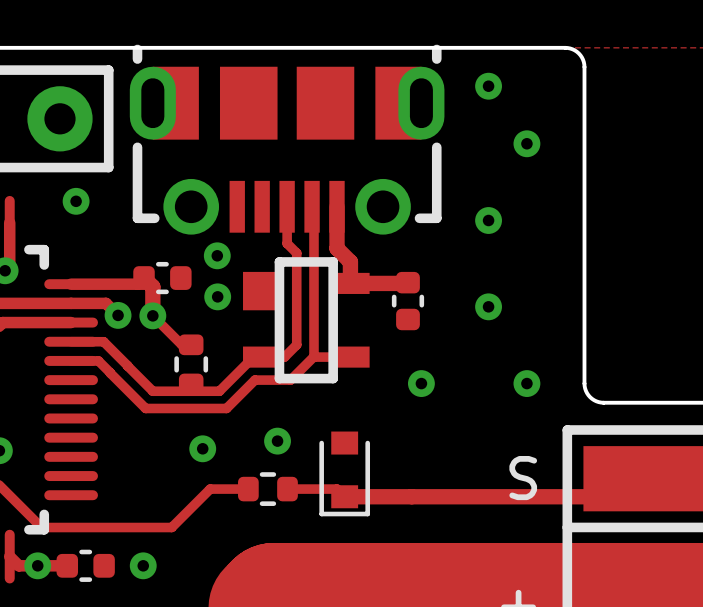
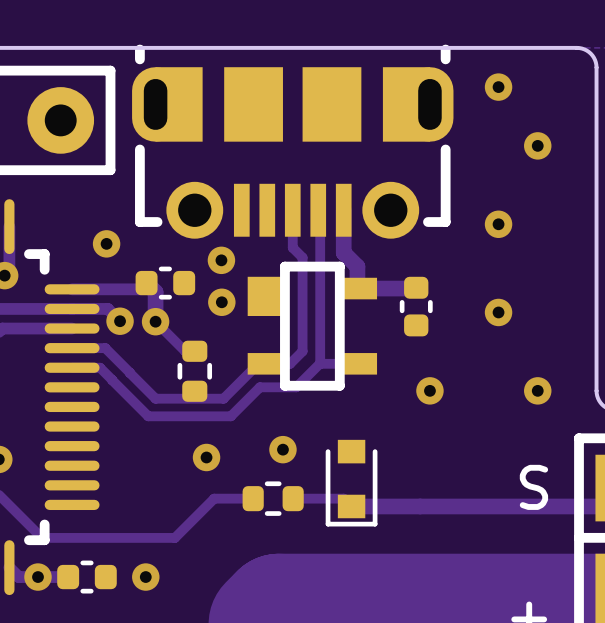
via position: (76, 201) -> (106, 243)

